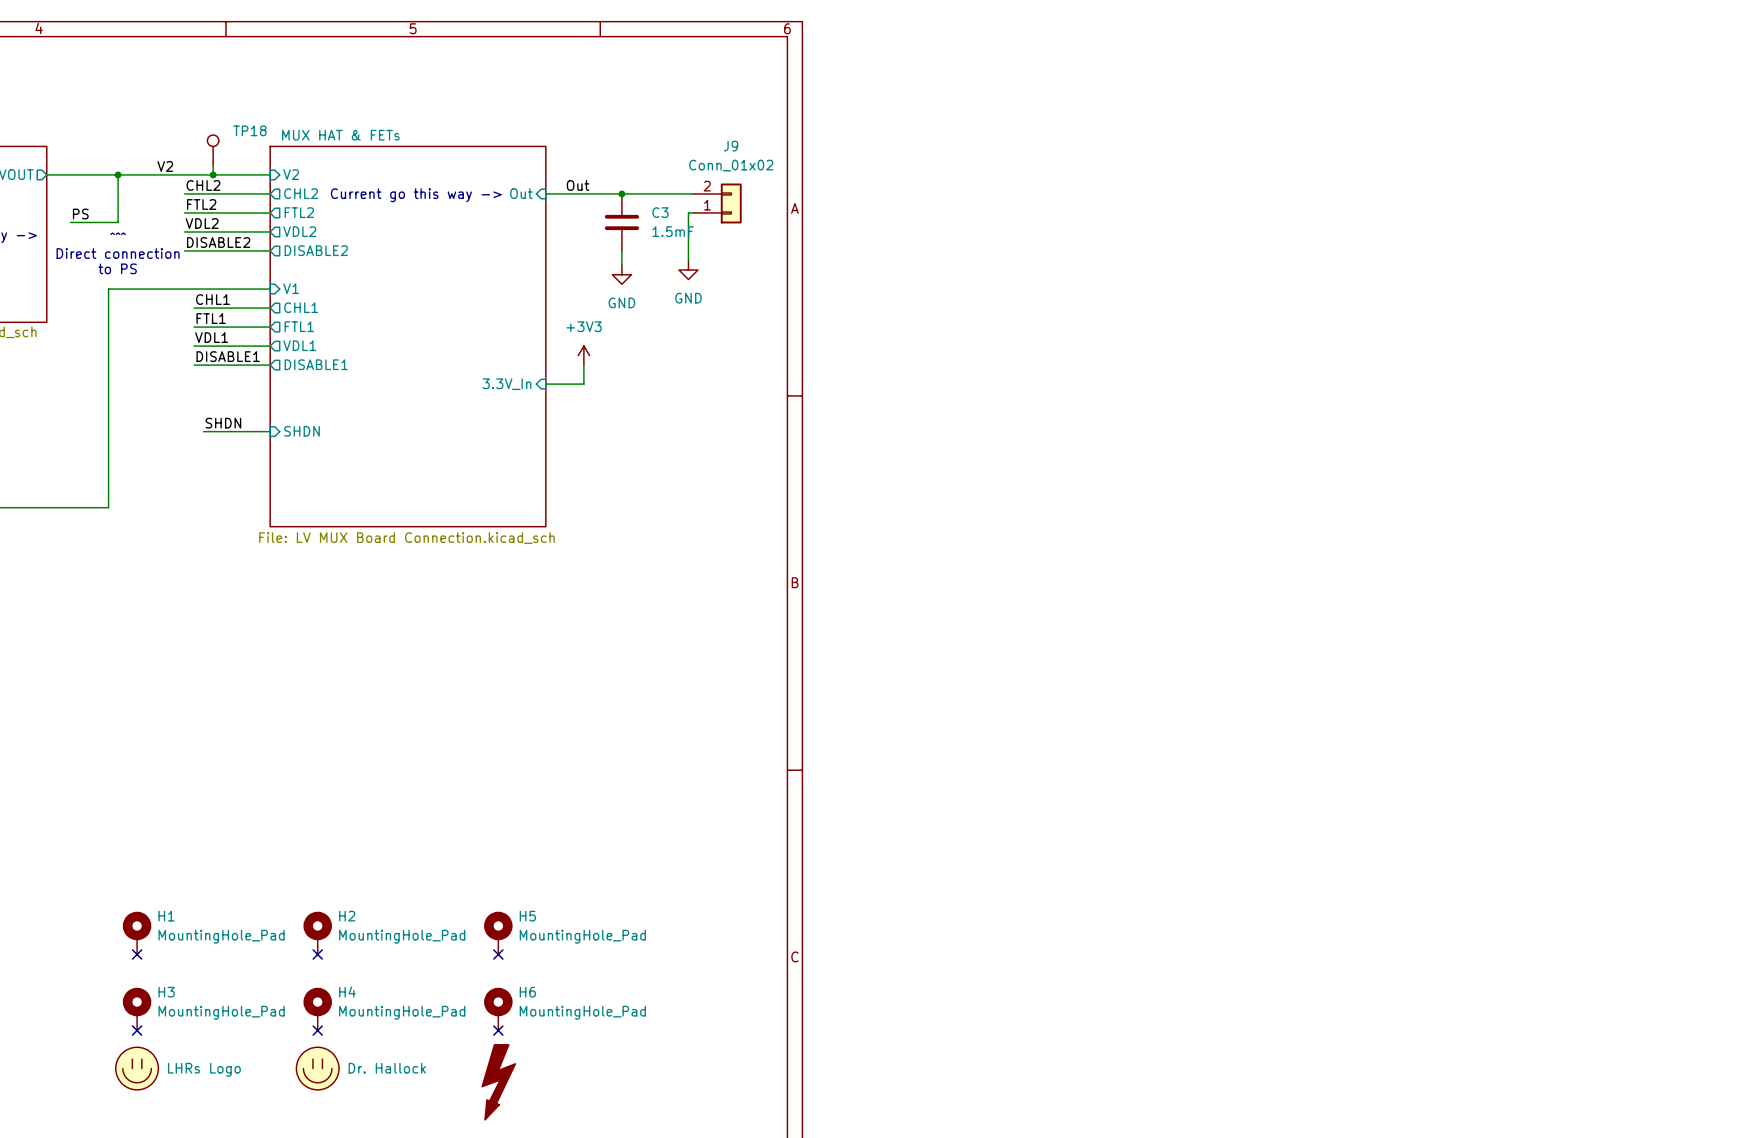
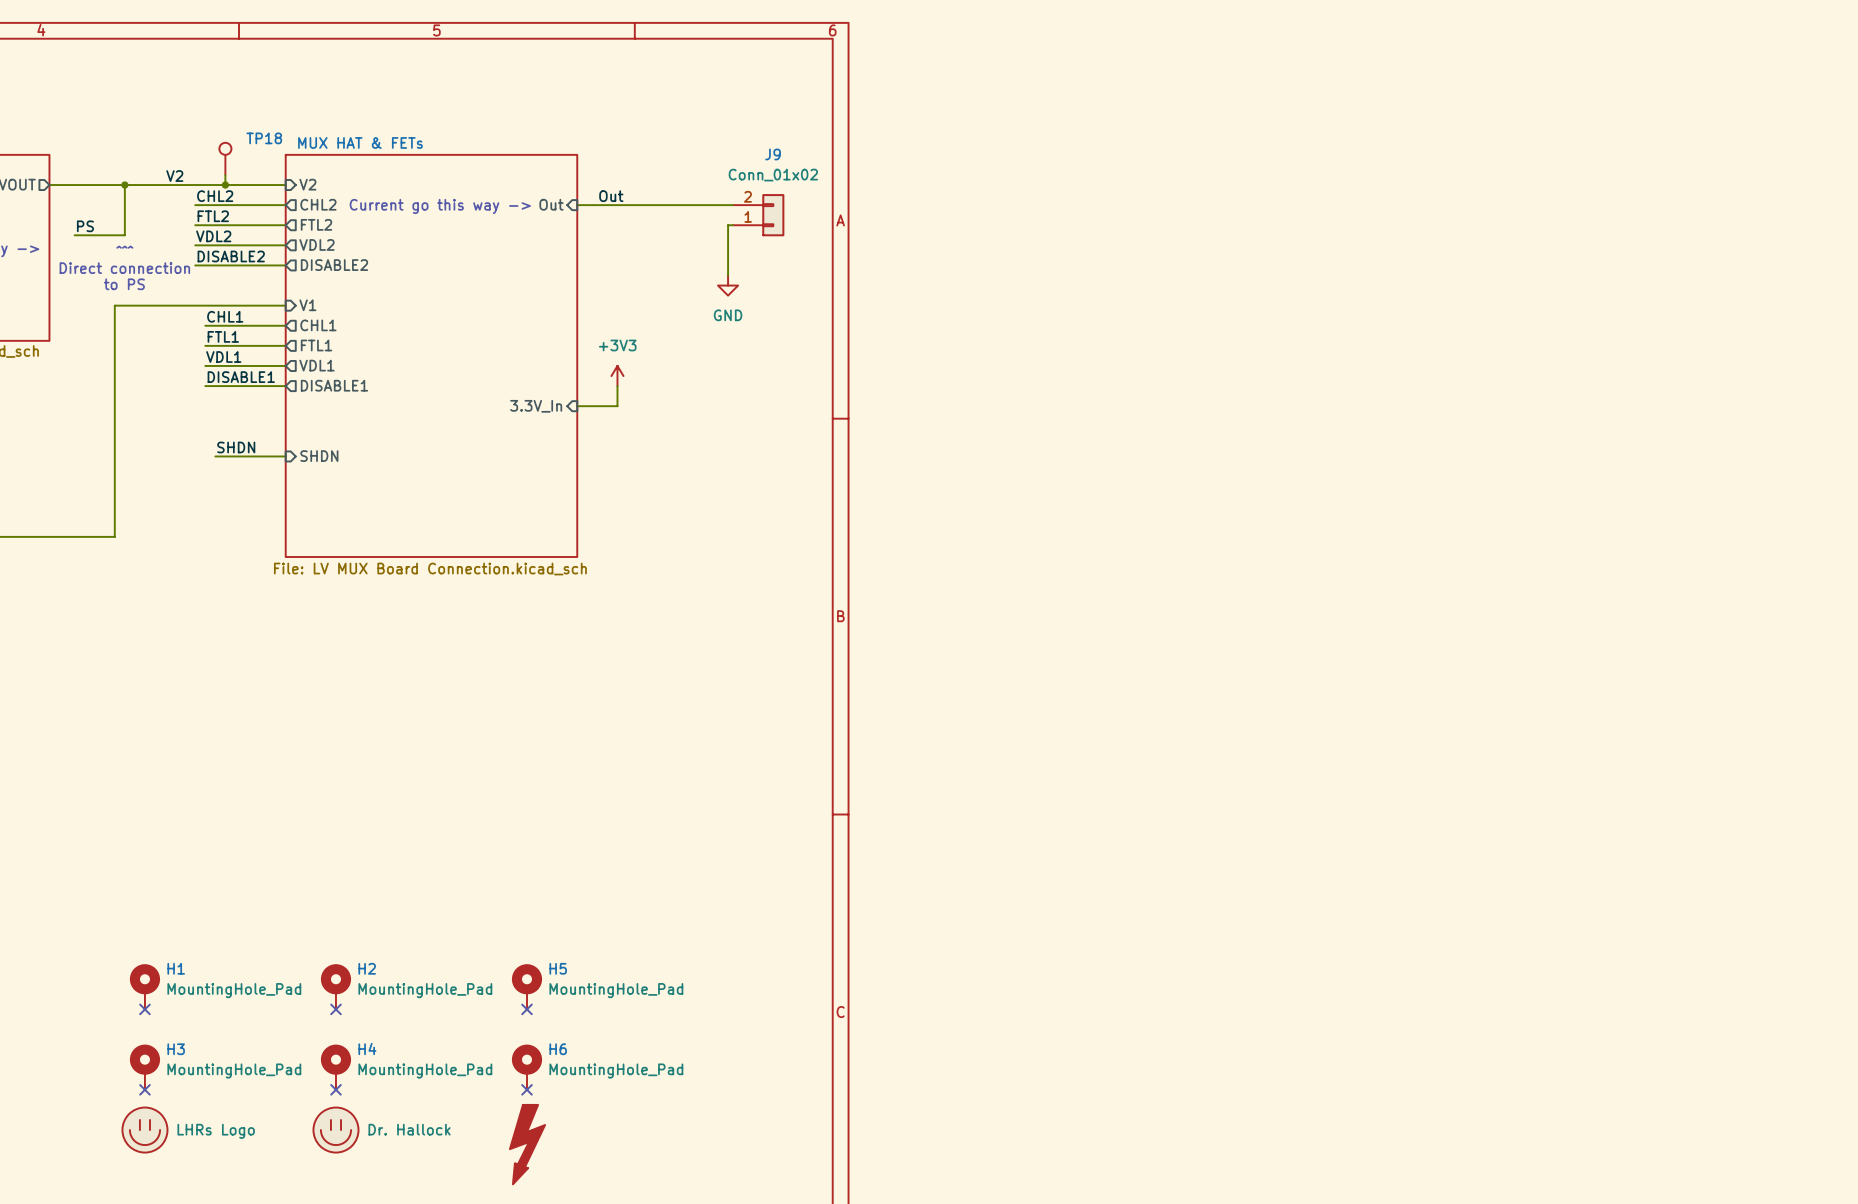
junction: (621, 193) -> none
C3: 1.5mF (621, 222) -> none
wire: (621, 251) (621, 265) -> none
power symbol: GND (621, 274) -> none

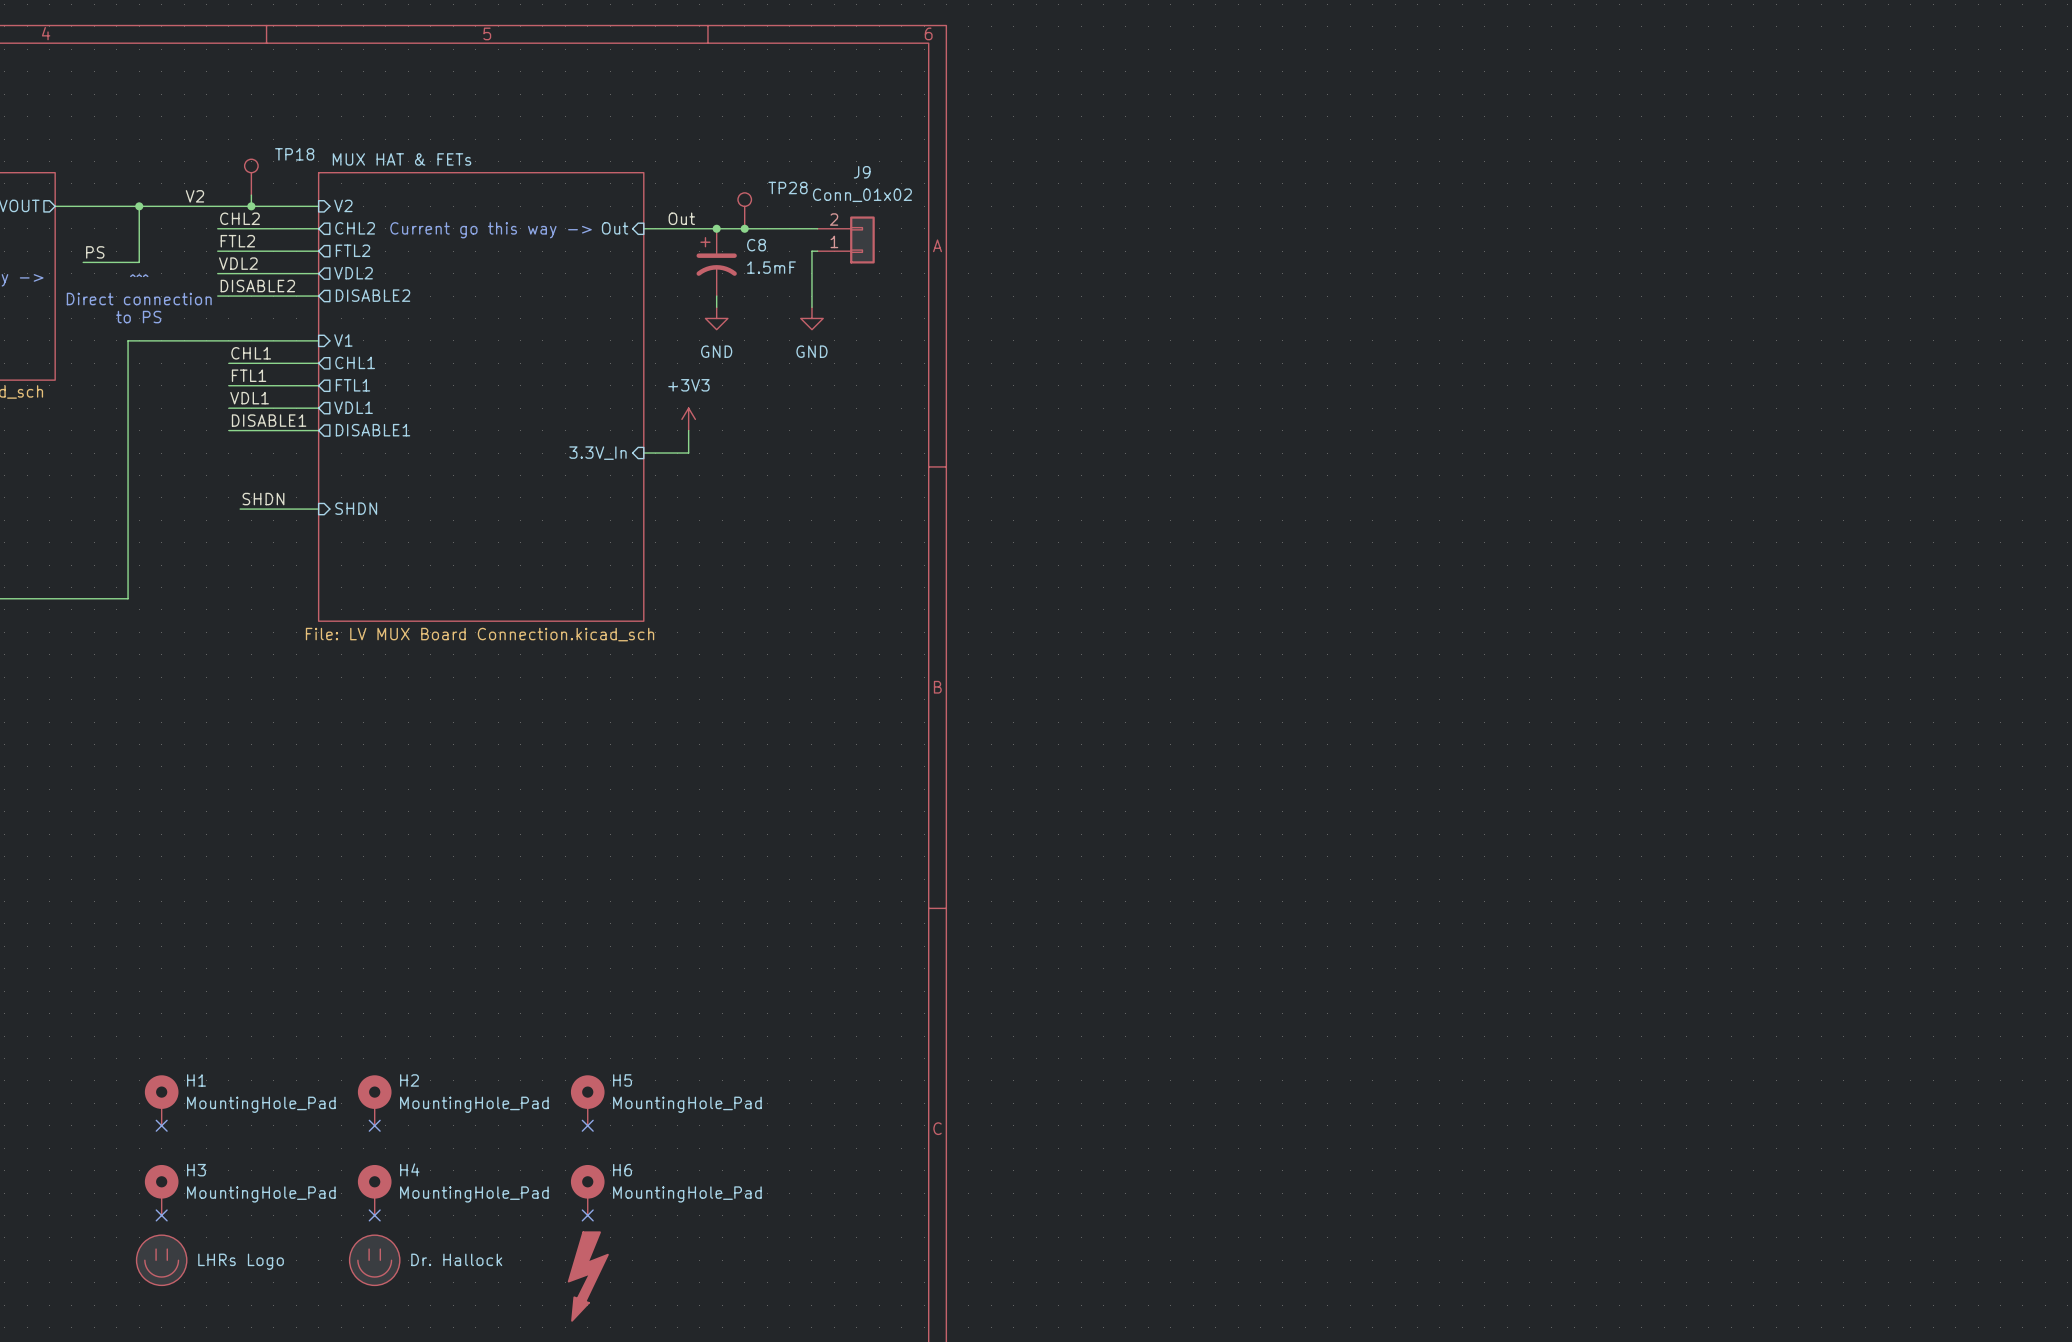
TP28: none -> (744, 210)
junction: none -> (716, 228)
junction: none -> (744, 228)
C8: none -> 1.5mF (716, 262)
wire: none -> (716, 296) (716, 307)
power symbol: none -> GND (716, 318)

